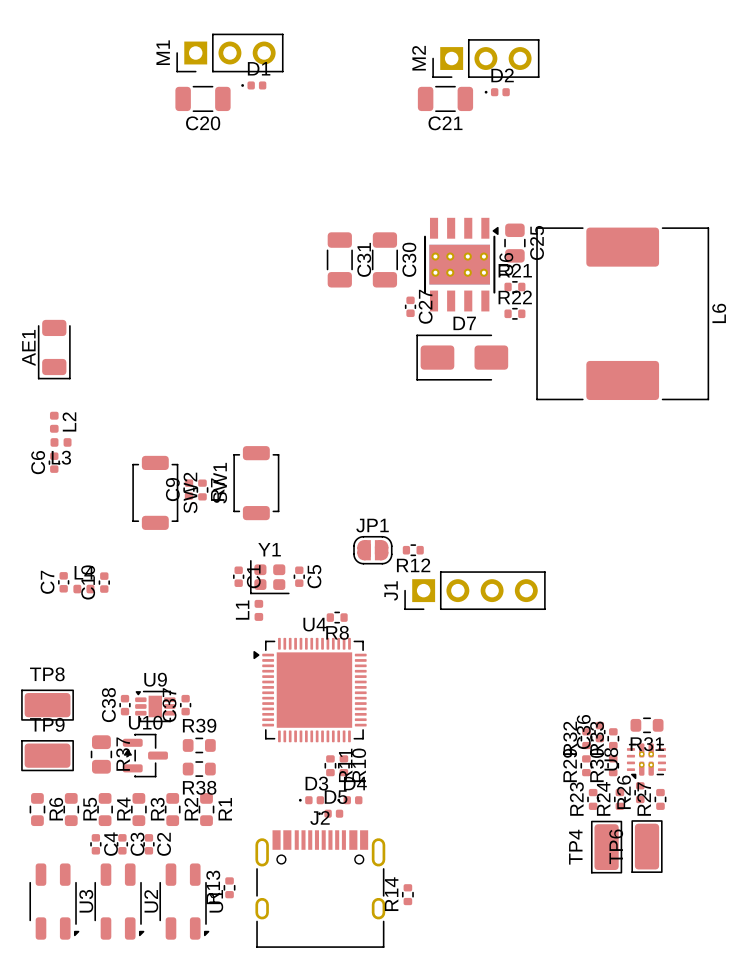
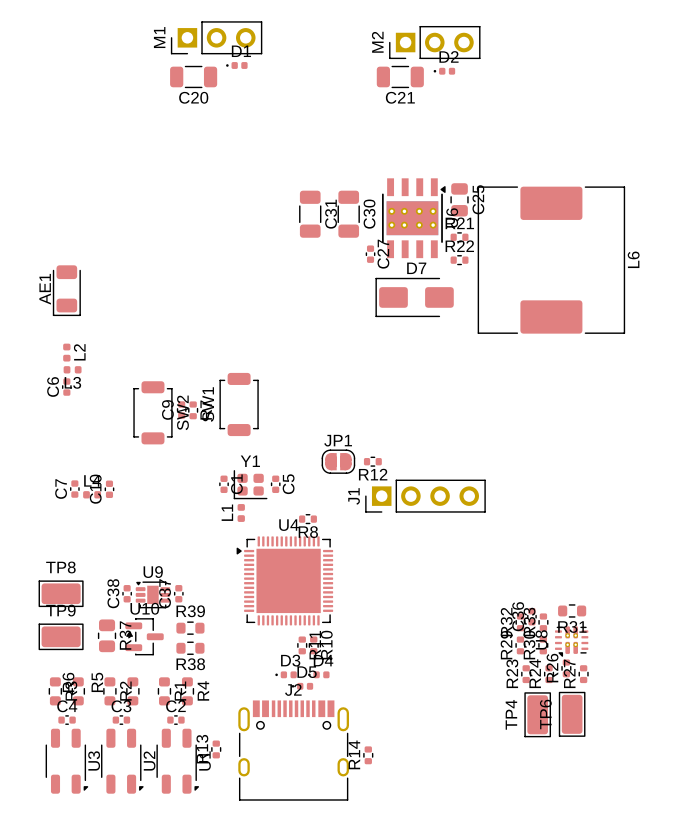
R6 position: (37, 809) -> (78, 691)
R5 position: (71, 809) -> (132, 691)
R4 position: (105, 809) -> (187, 691)
R3 position: (138, 809) -> (55, 691)
R2 position: (172, 809) -> (109, 691)
R1 position: (206, 809) -> (164, 691)
C4 rotation: 0° (95, 844) -> 90° clockwise (67, 720)
C4 position: (95, 844) -> (67, 720)
C3 rotation: 0° (122, 844) -> 90° clockwise (121, 720)
C2 rotation: 0° (148, 844) -> 90° clockwise (175, 720)
C2 position: (148, 844) -> (175, 720)

